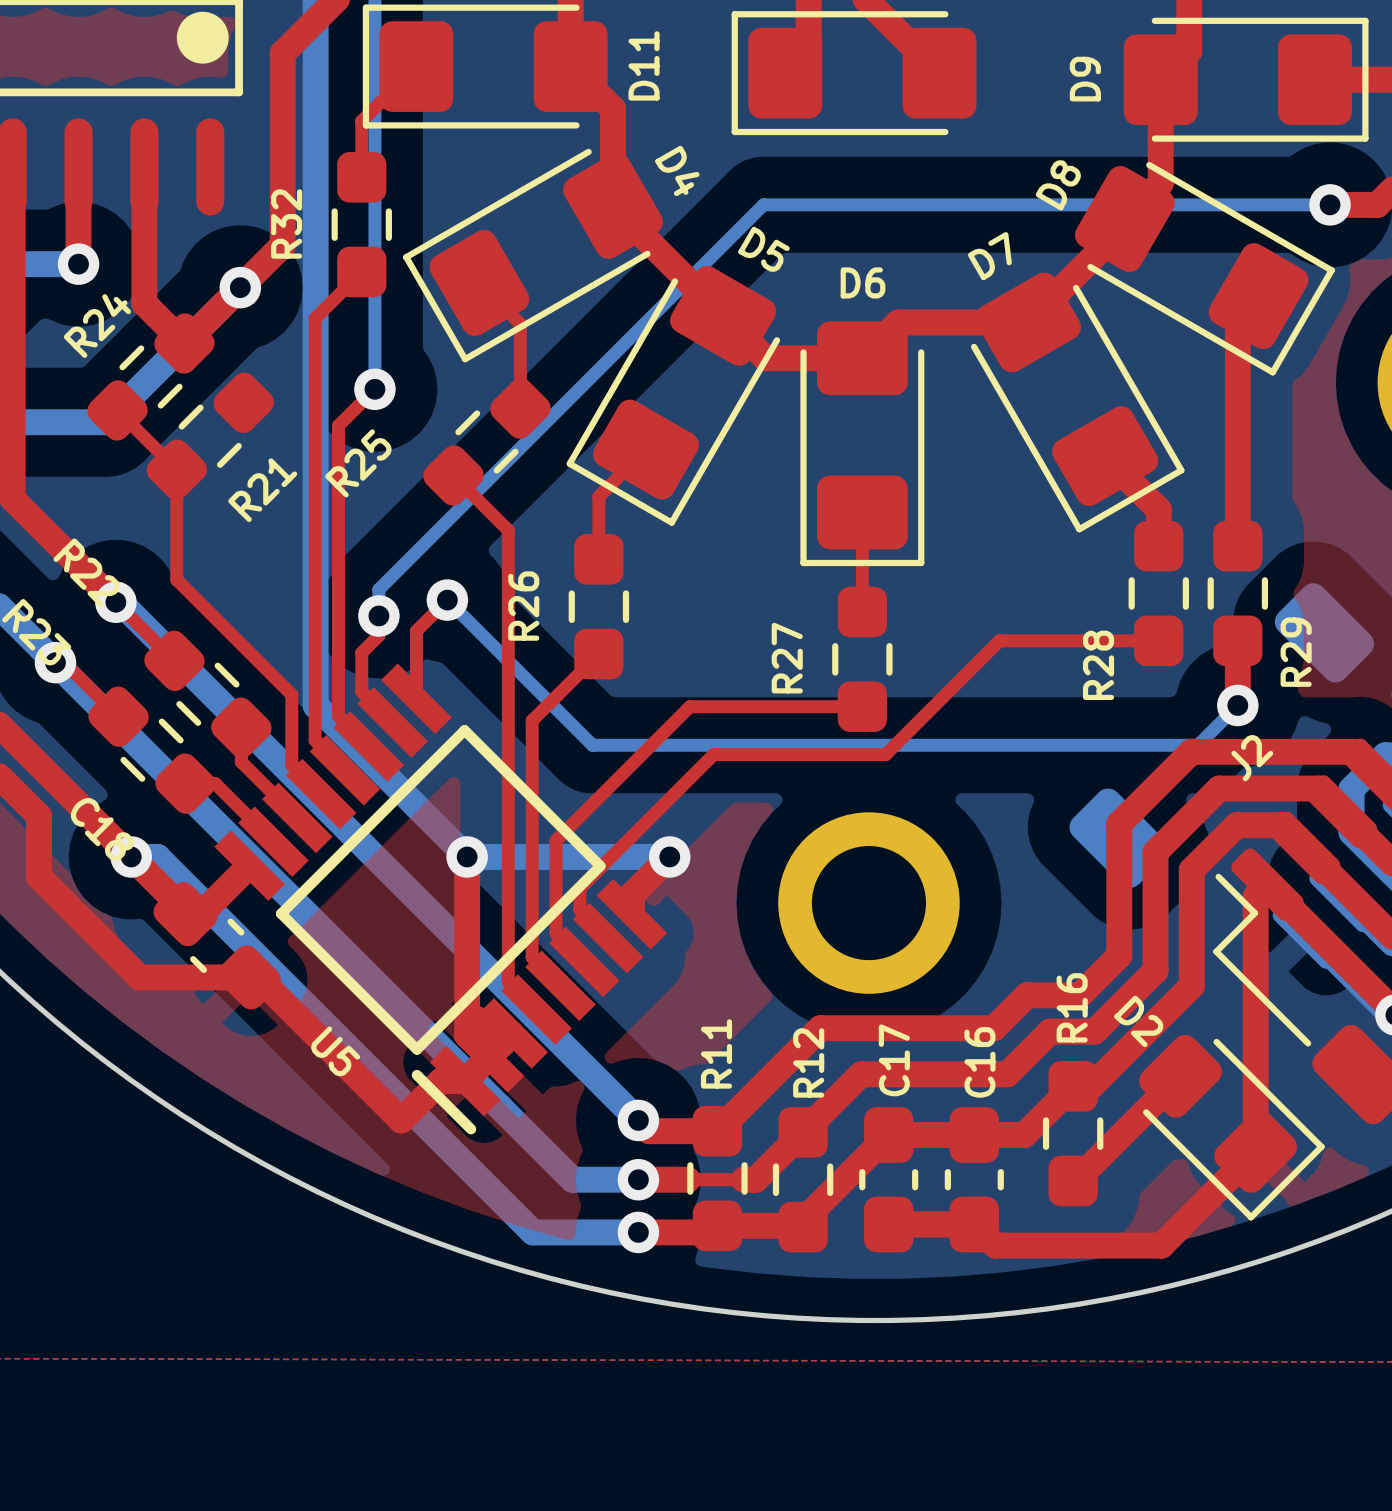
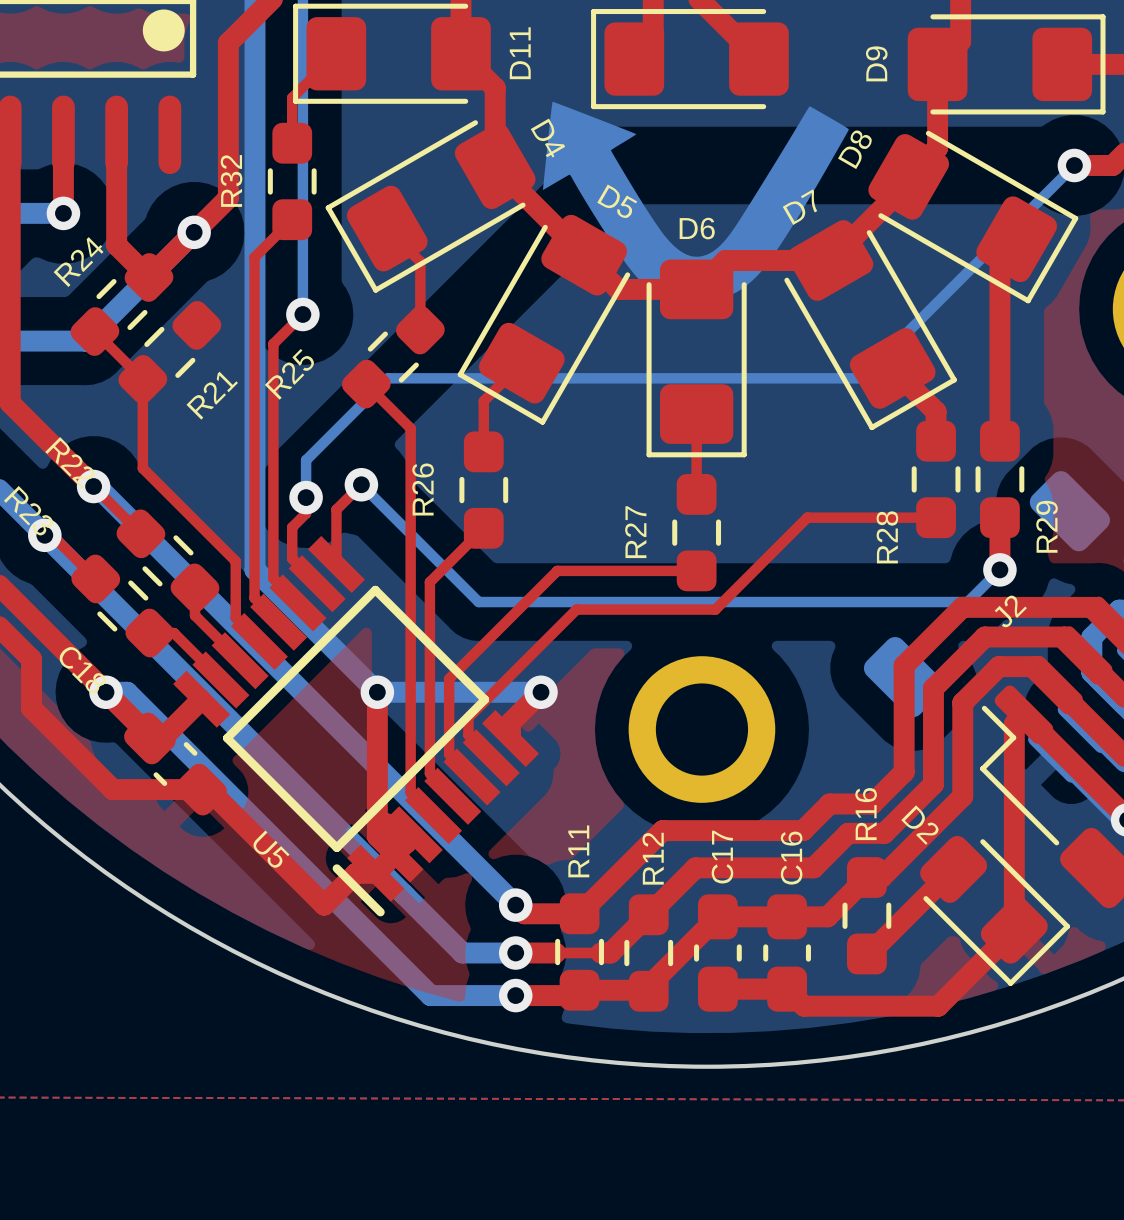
drawing: none -> [542, 101, 849, 303]
bottom track: (1330, 204) (763, 204) (378, 589) -> (1074, 165) (861, 378) (388, 378) (306, 460) (306, 476)

